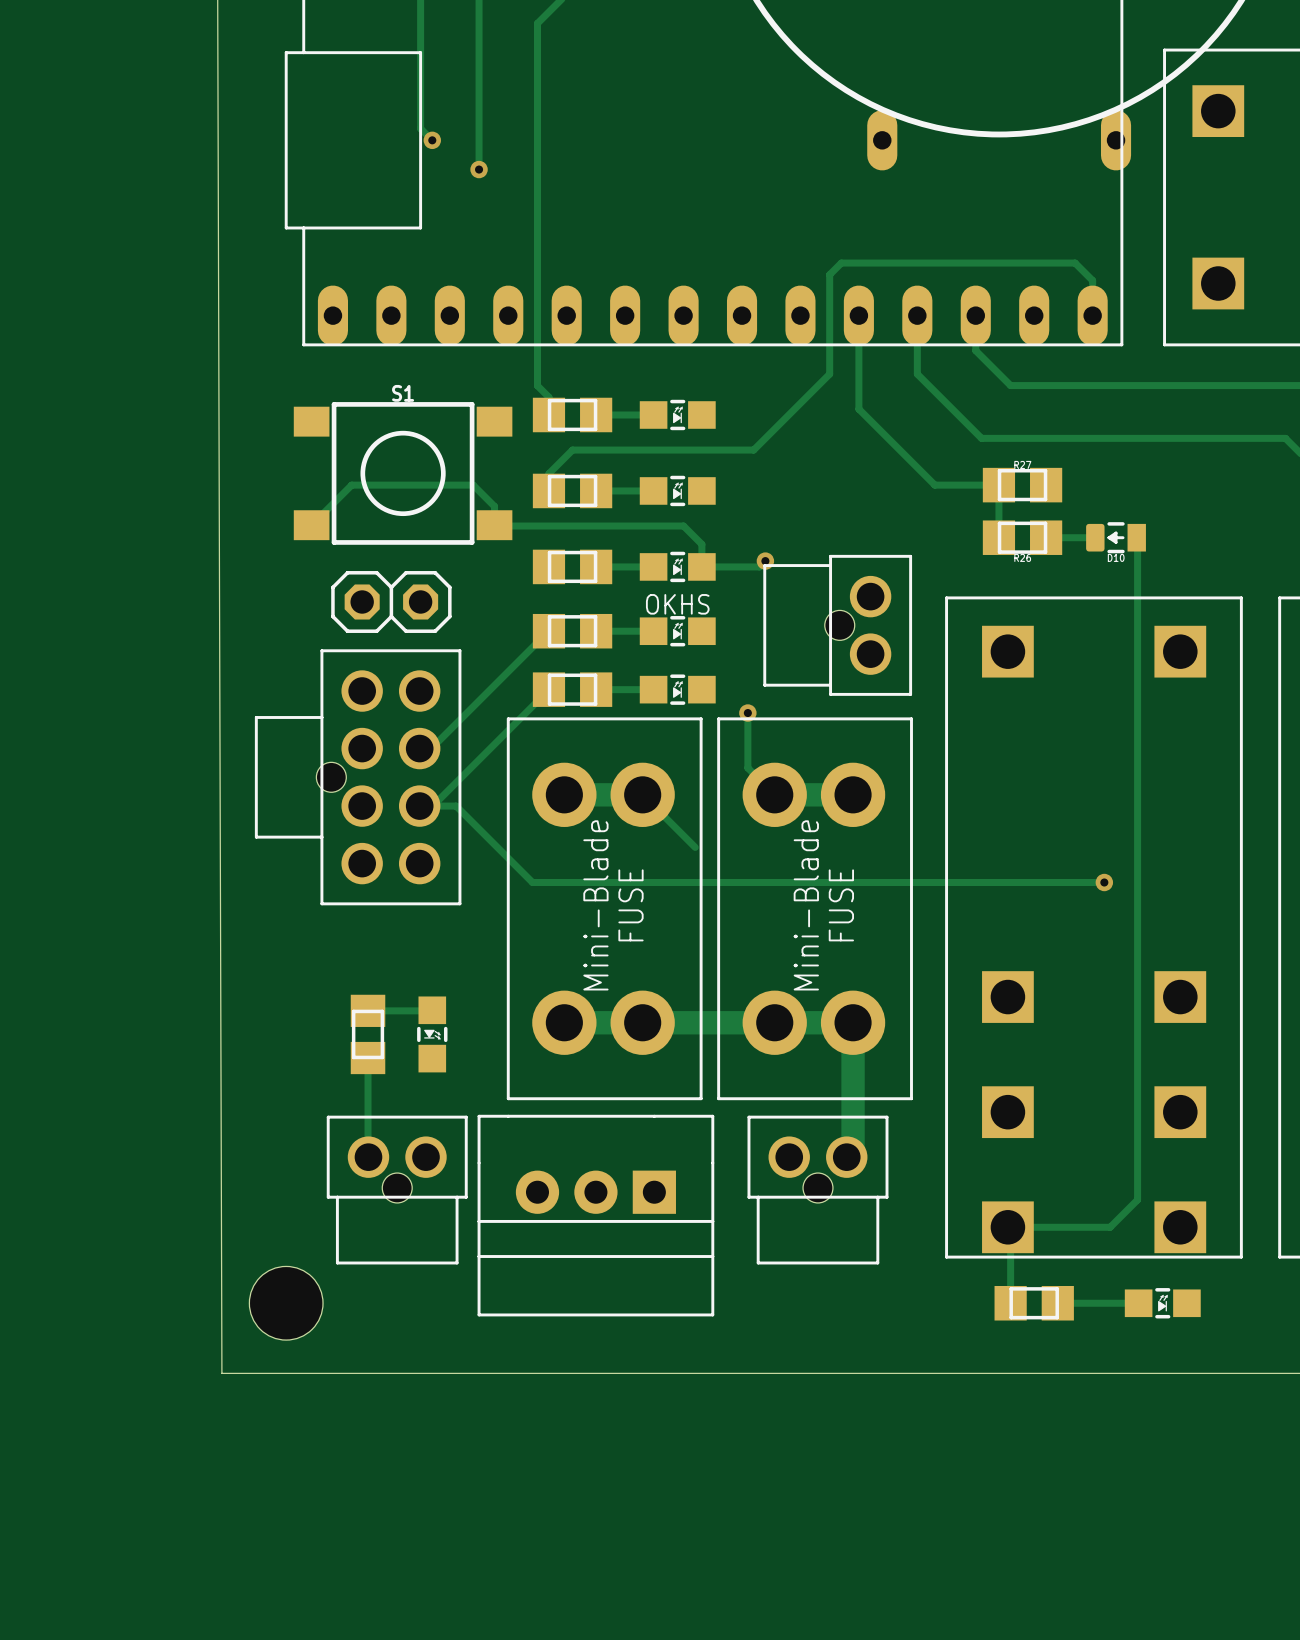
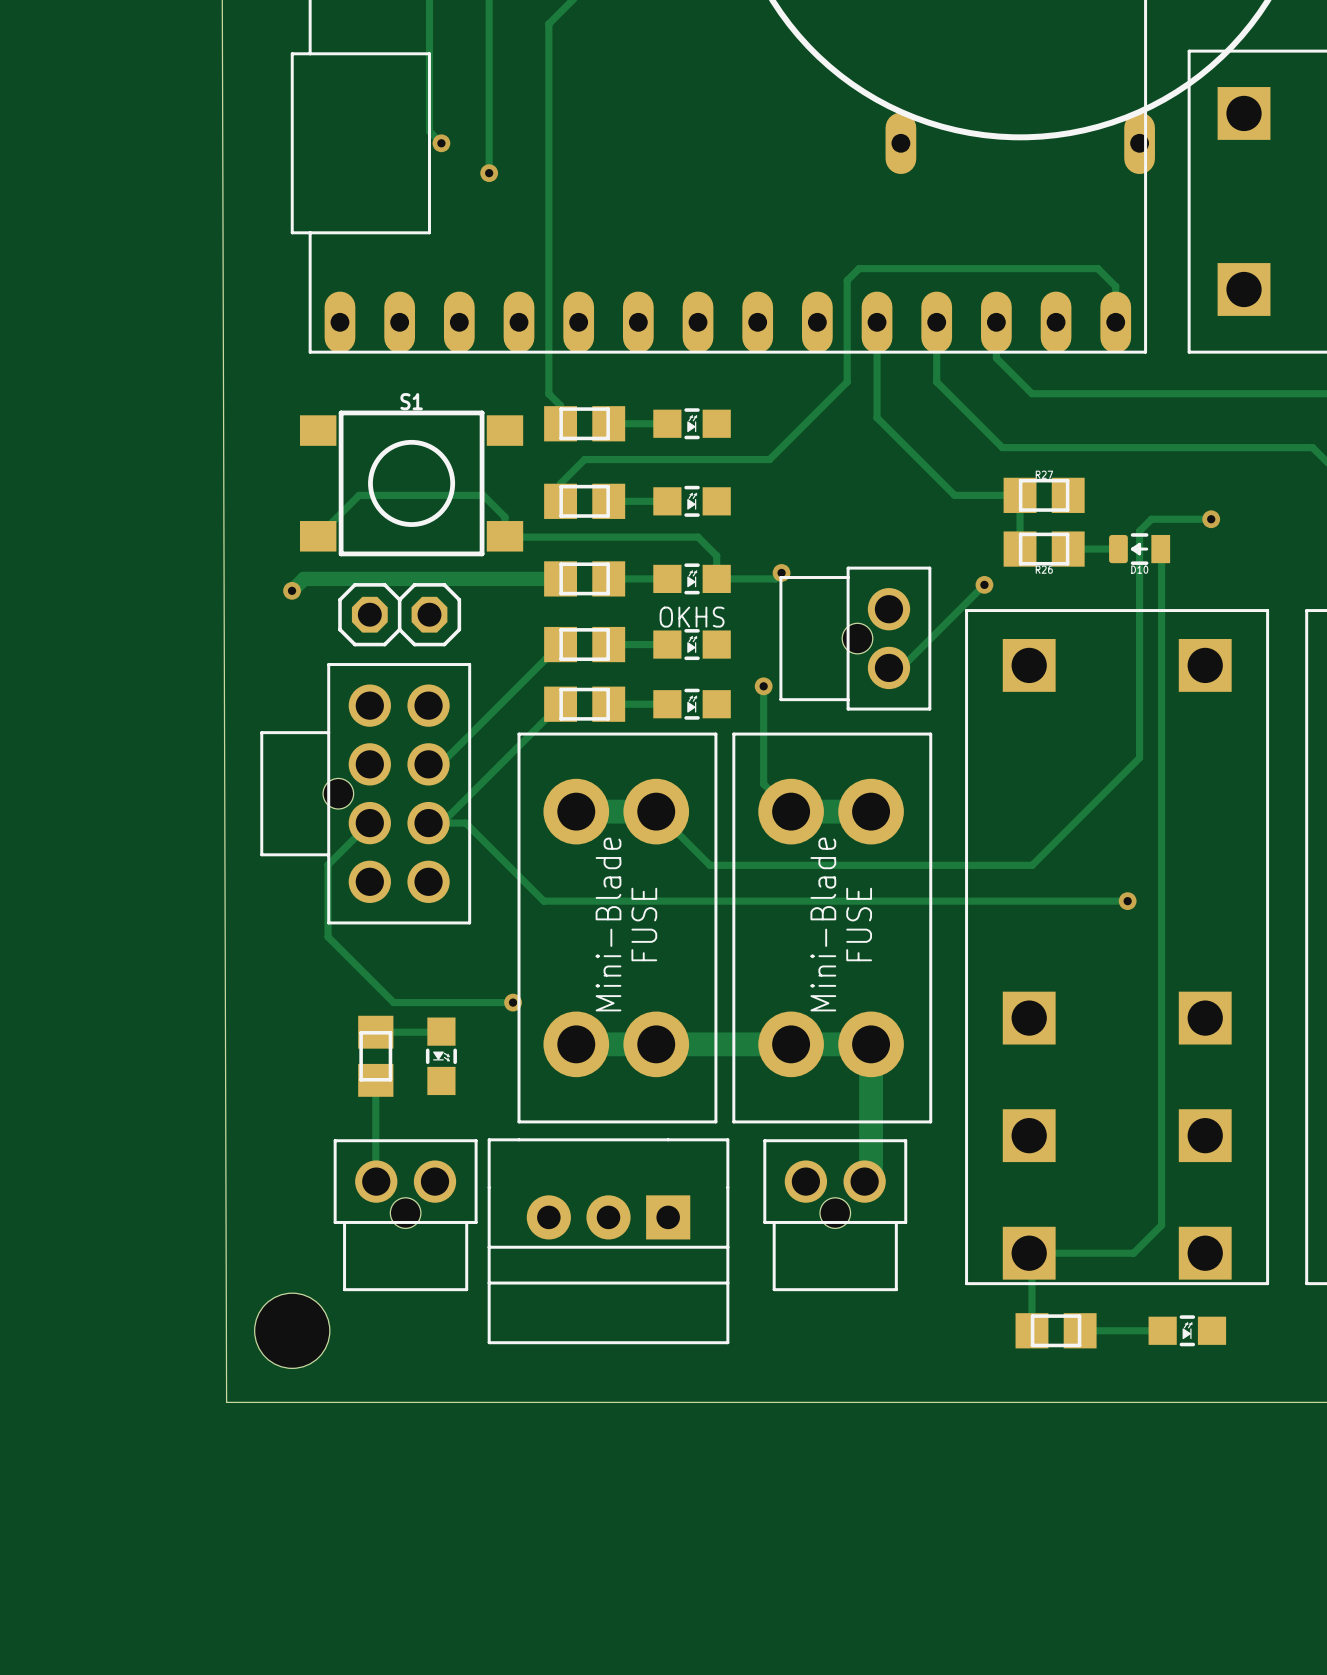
track: none -> (1211, 519) (1151, 519) (1139, 531) (1139, 757) (1032, 865) (709, 865)
via: none -> (1211, 519)
track: none -> (560, 578) (303, 578) (292, 590)
track: none -> (984, 584) (901, 667) (888, 667)
via: none -> (984, 584)
via: none -> (292, 590)
track: none -> (763, 686) (763, 728)
via position: (747, 713) -> (763, 686)
track: none -> (369, 823) (328, 864) (328, 936) (393, 1002) (513, 1002)
via: none -> (513, 1002)

